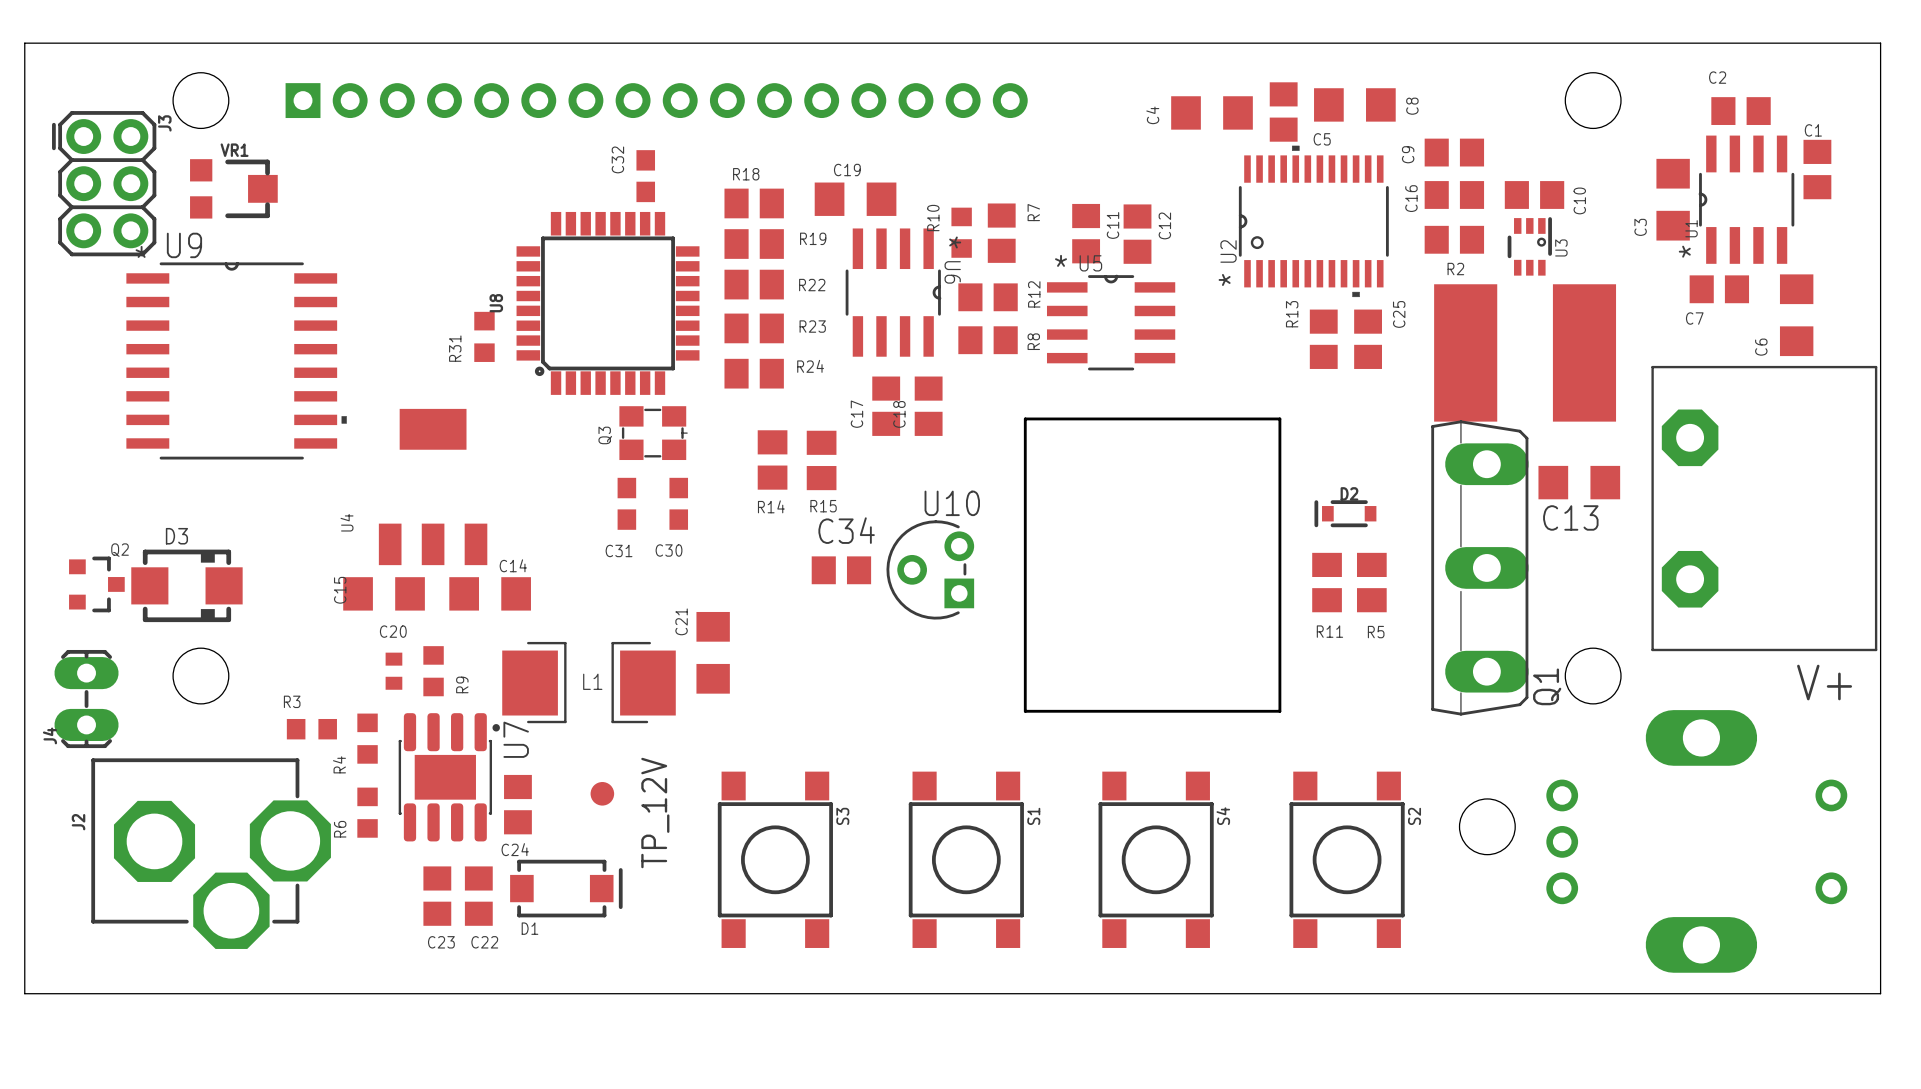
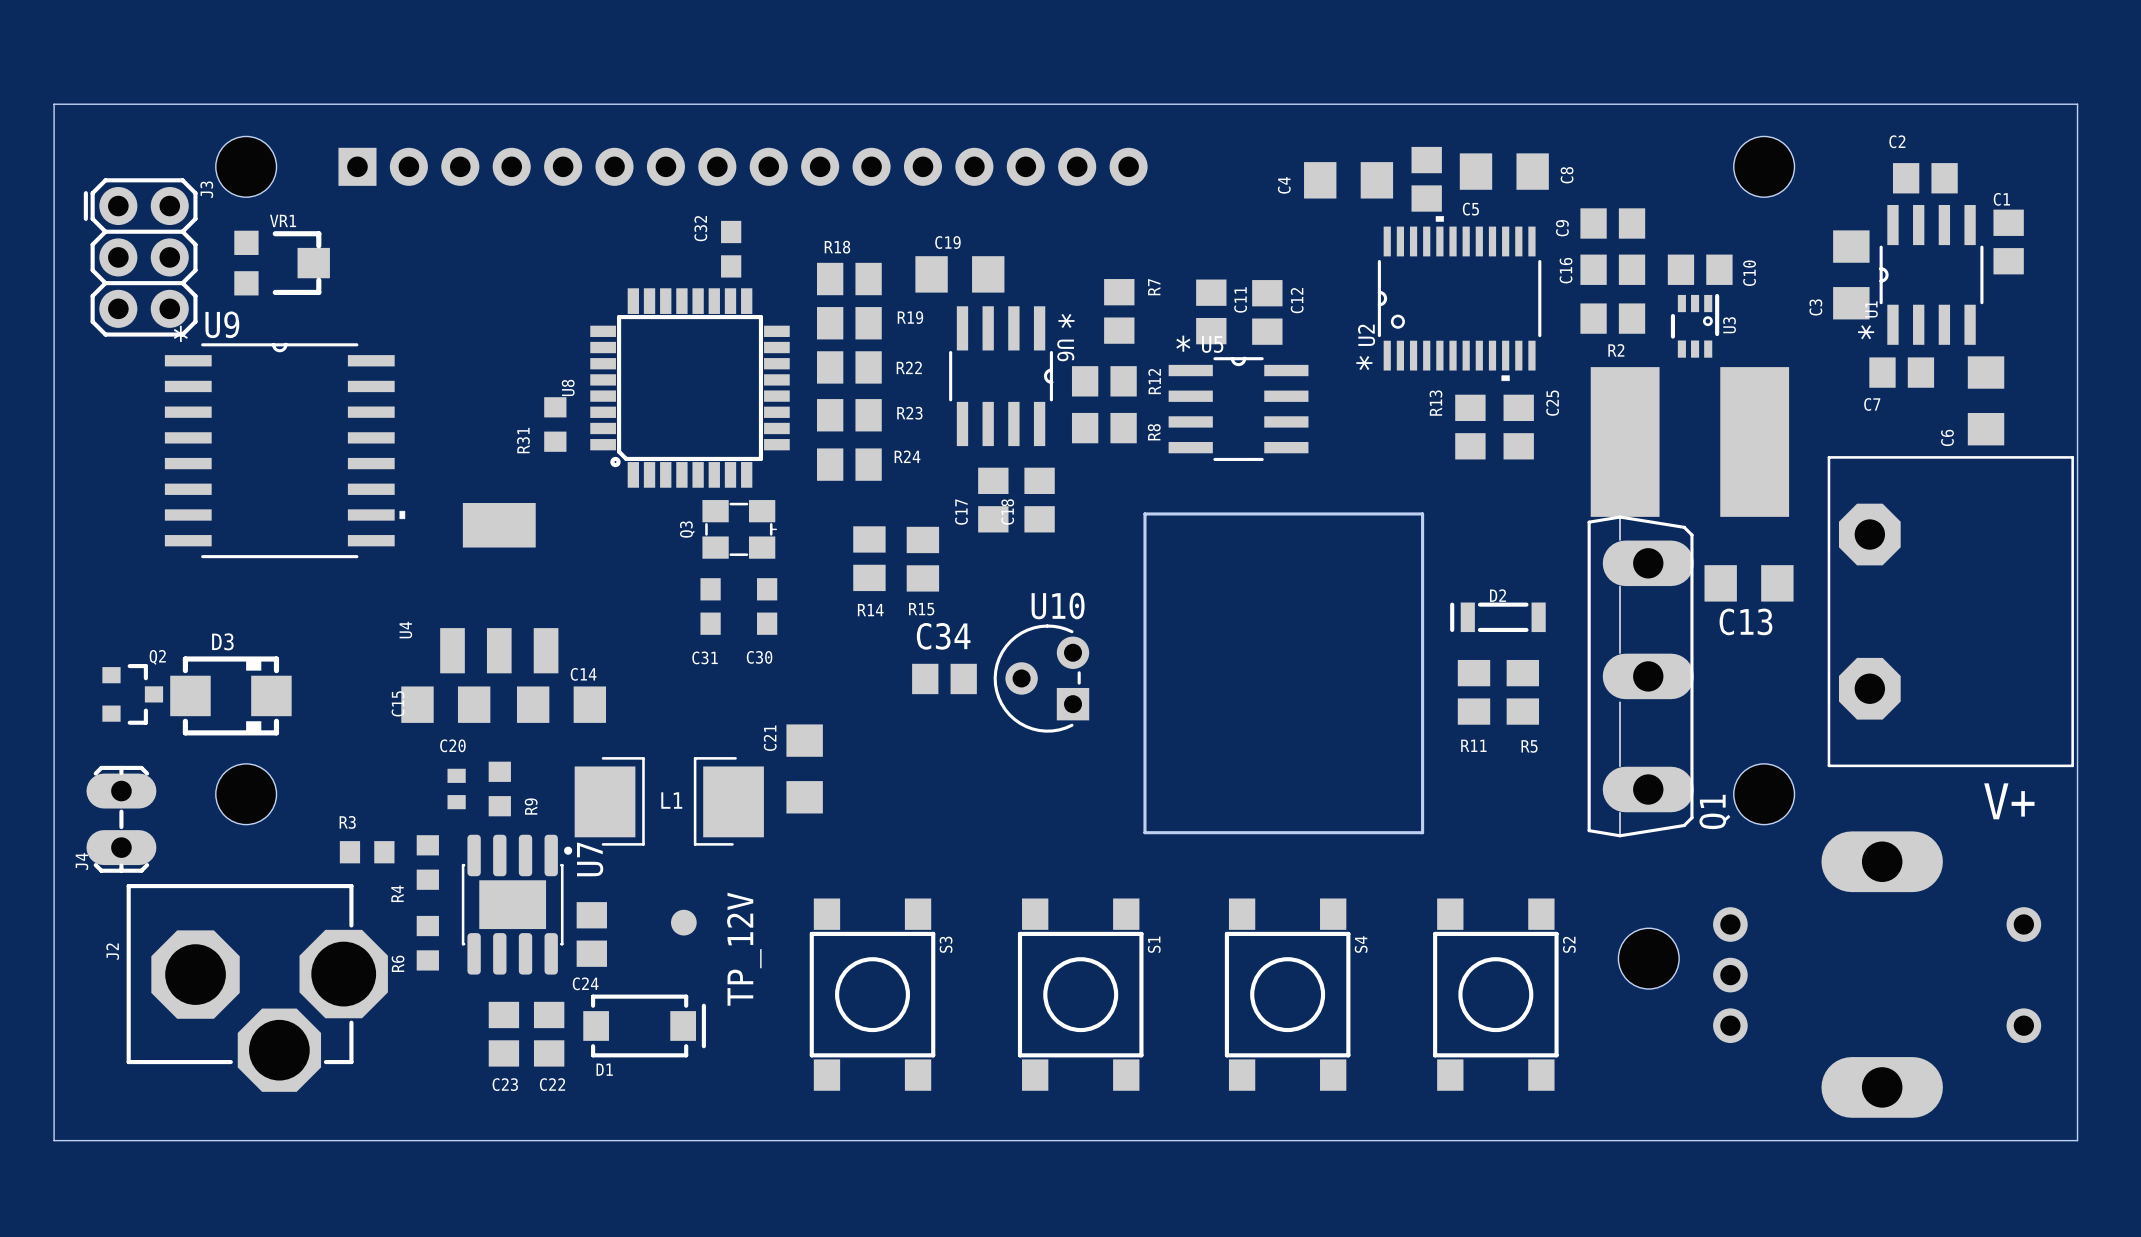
R10: (961, 232) -> none
D2 footprint: [1314, 500, 1377, 528] -> [1450, 602, 1546, 633]

